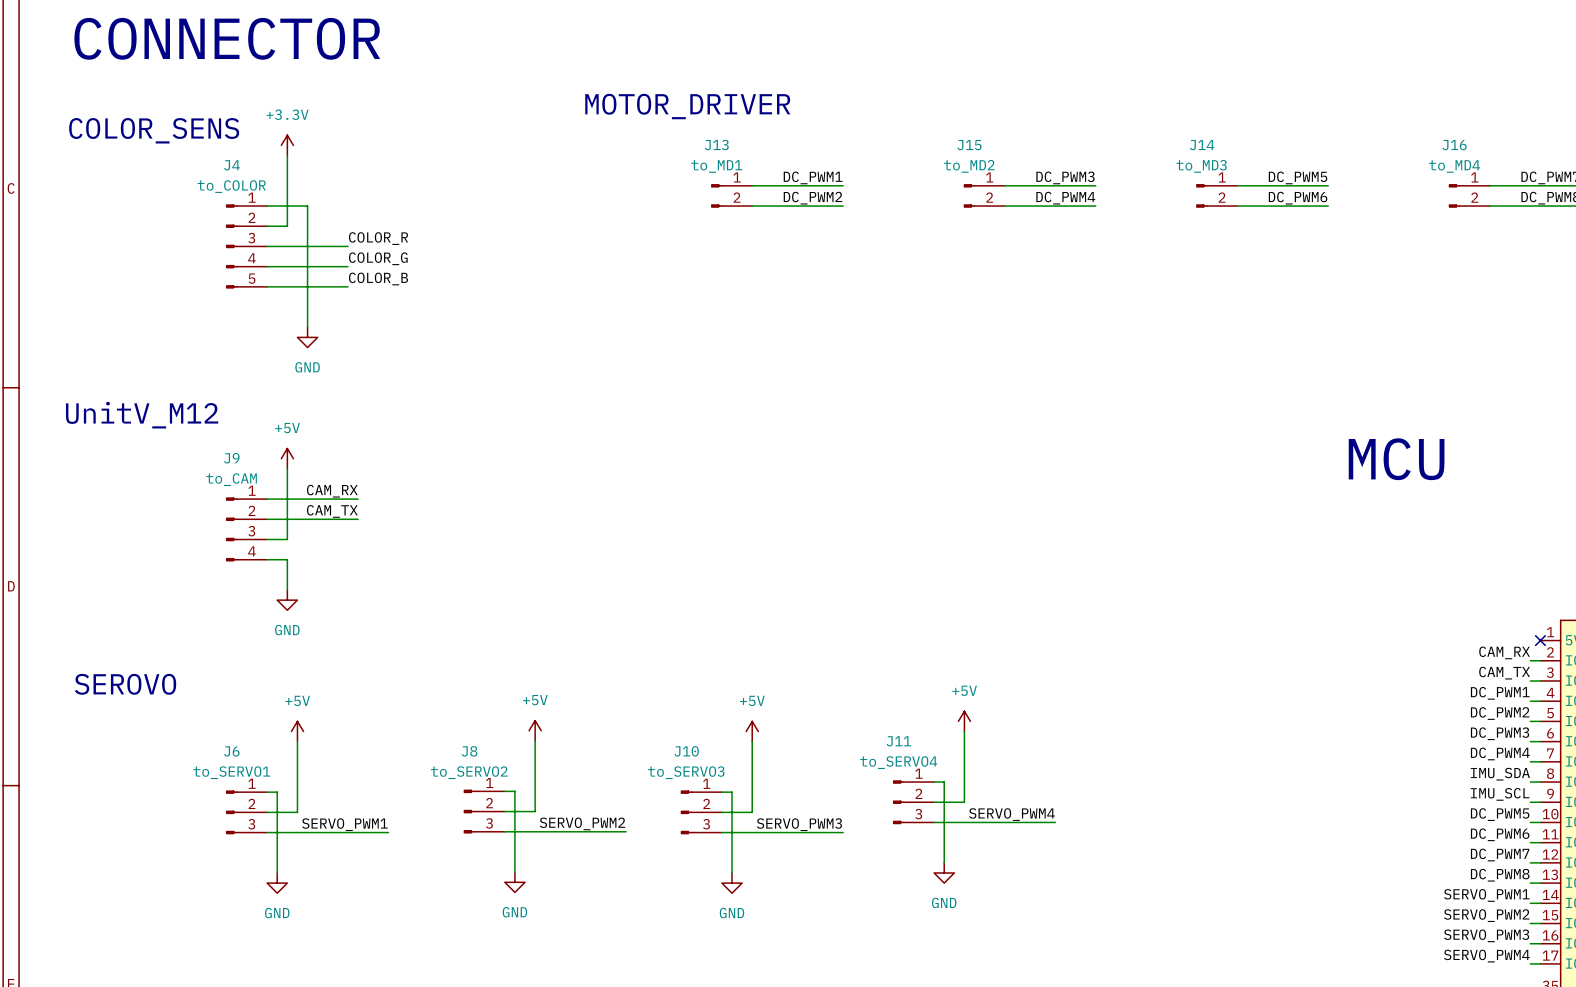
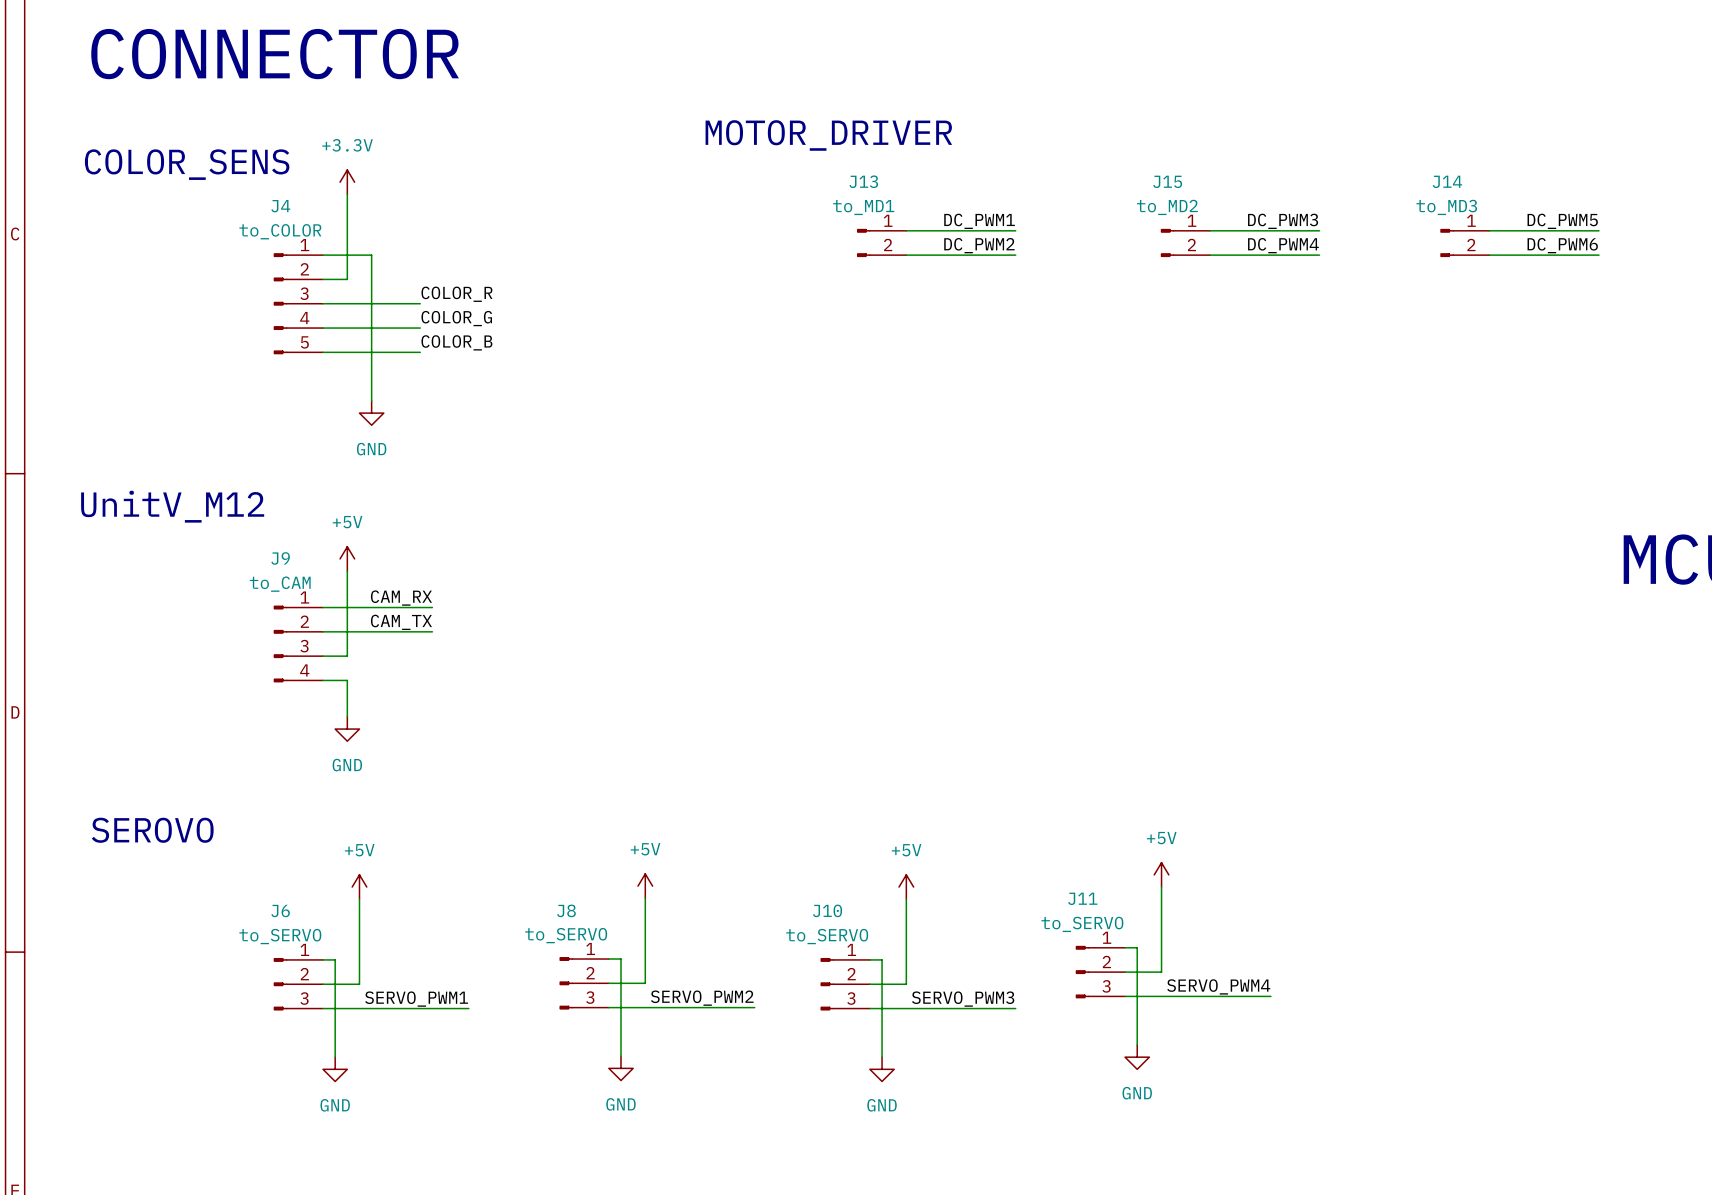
J11 value: to_SERVO4 (898, 762) -> to_SERVO (1082, 924)
J6 value: to_SERVO1 (231, 772) -> to_SERVO (280, 936)
J8 value: to_SERVO2 (469, 772) -> to_SERVO (566, 935)
J10 value: to_SERVO3 (686, 772) -> to_SERVO (827, 936)

